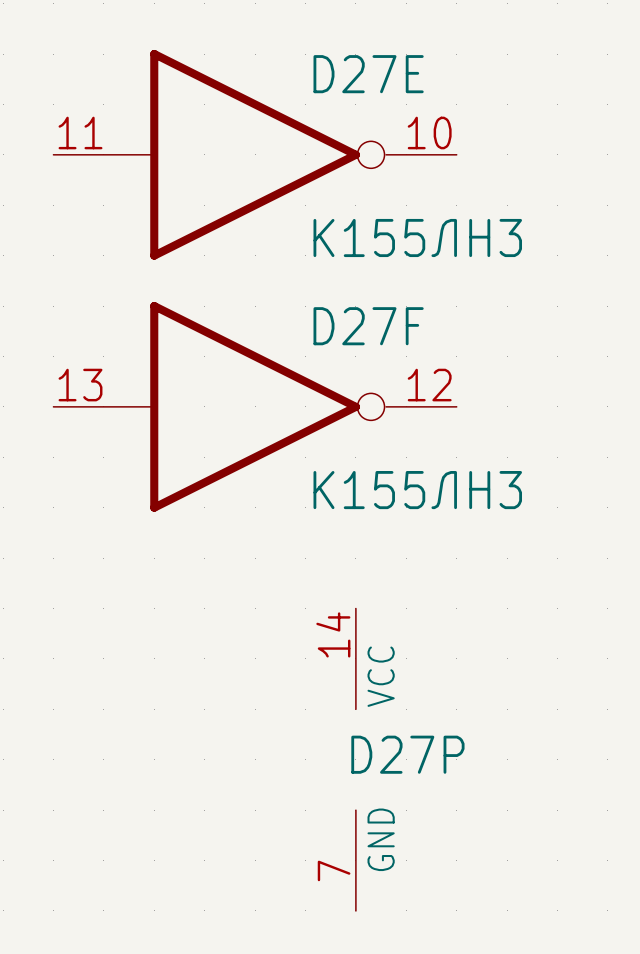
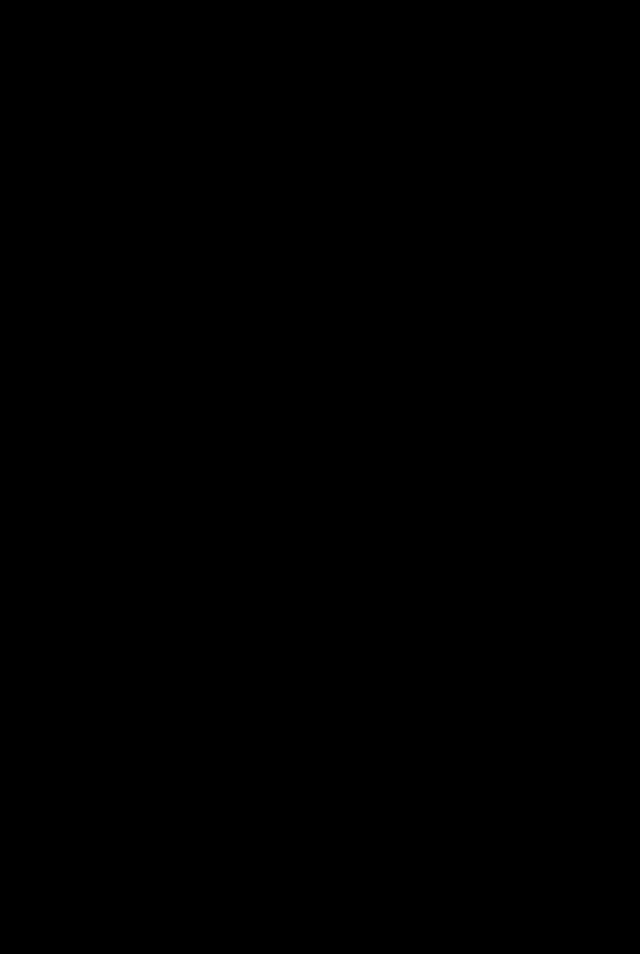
D27E: К155ЛН3 (255, 154) -> none
D27F: К155ЛН3 (255, 406) -> none
D27P: (355, 759) -> none

